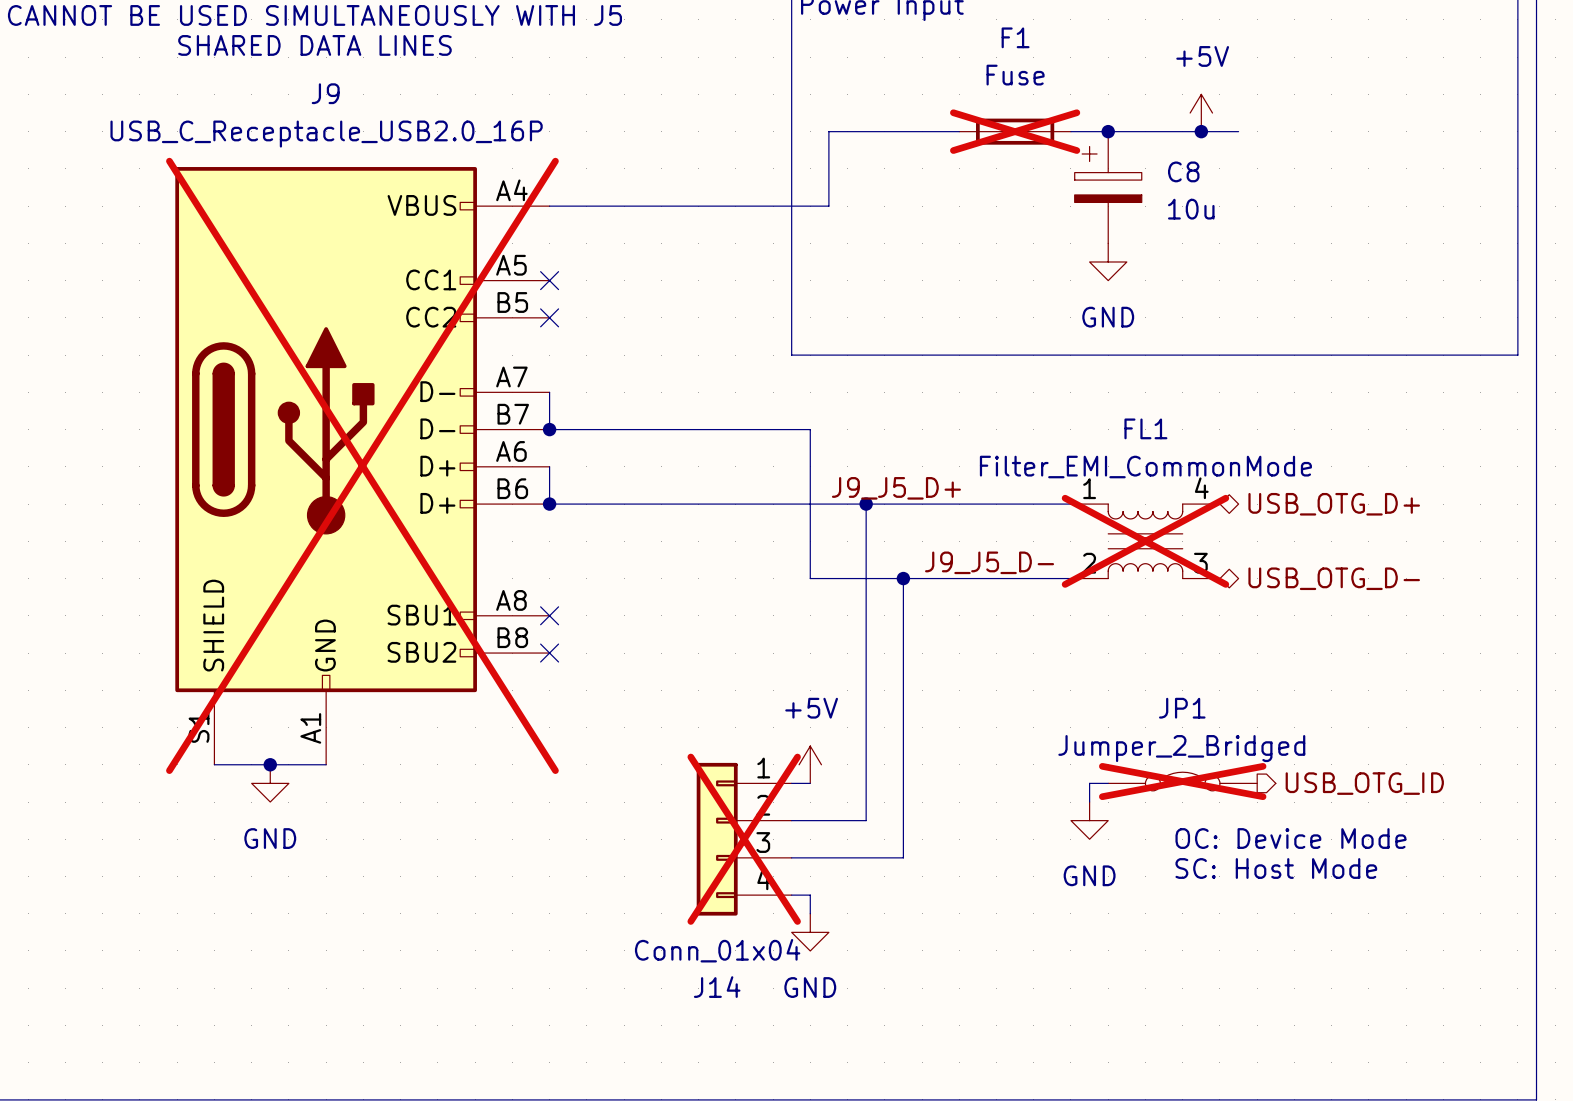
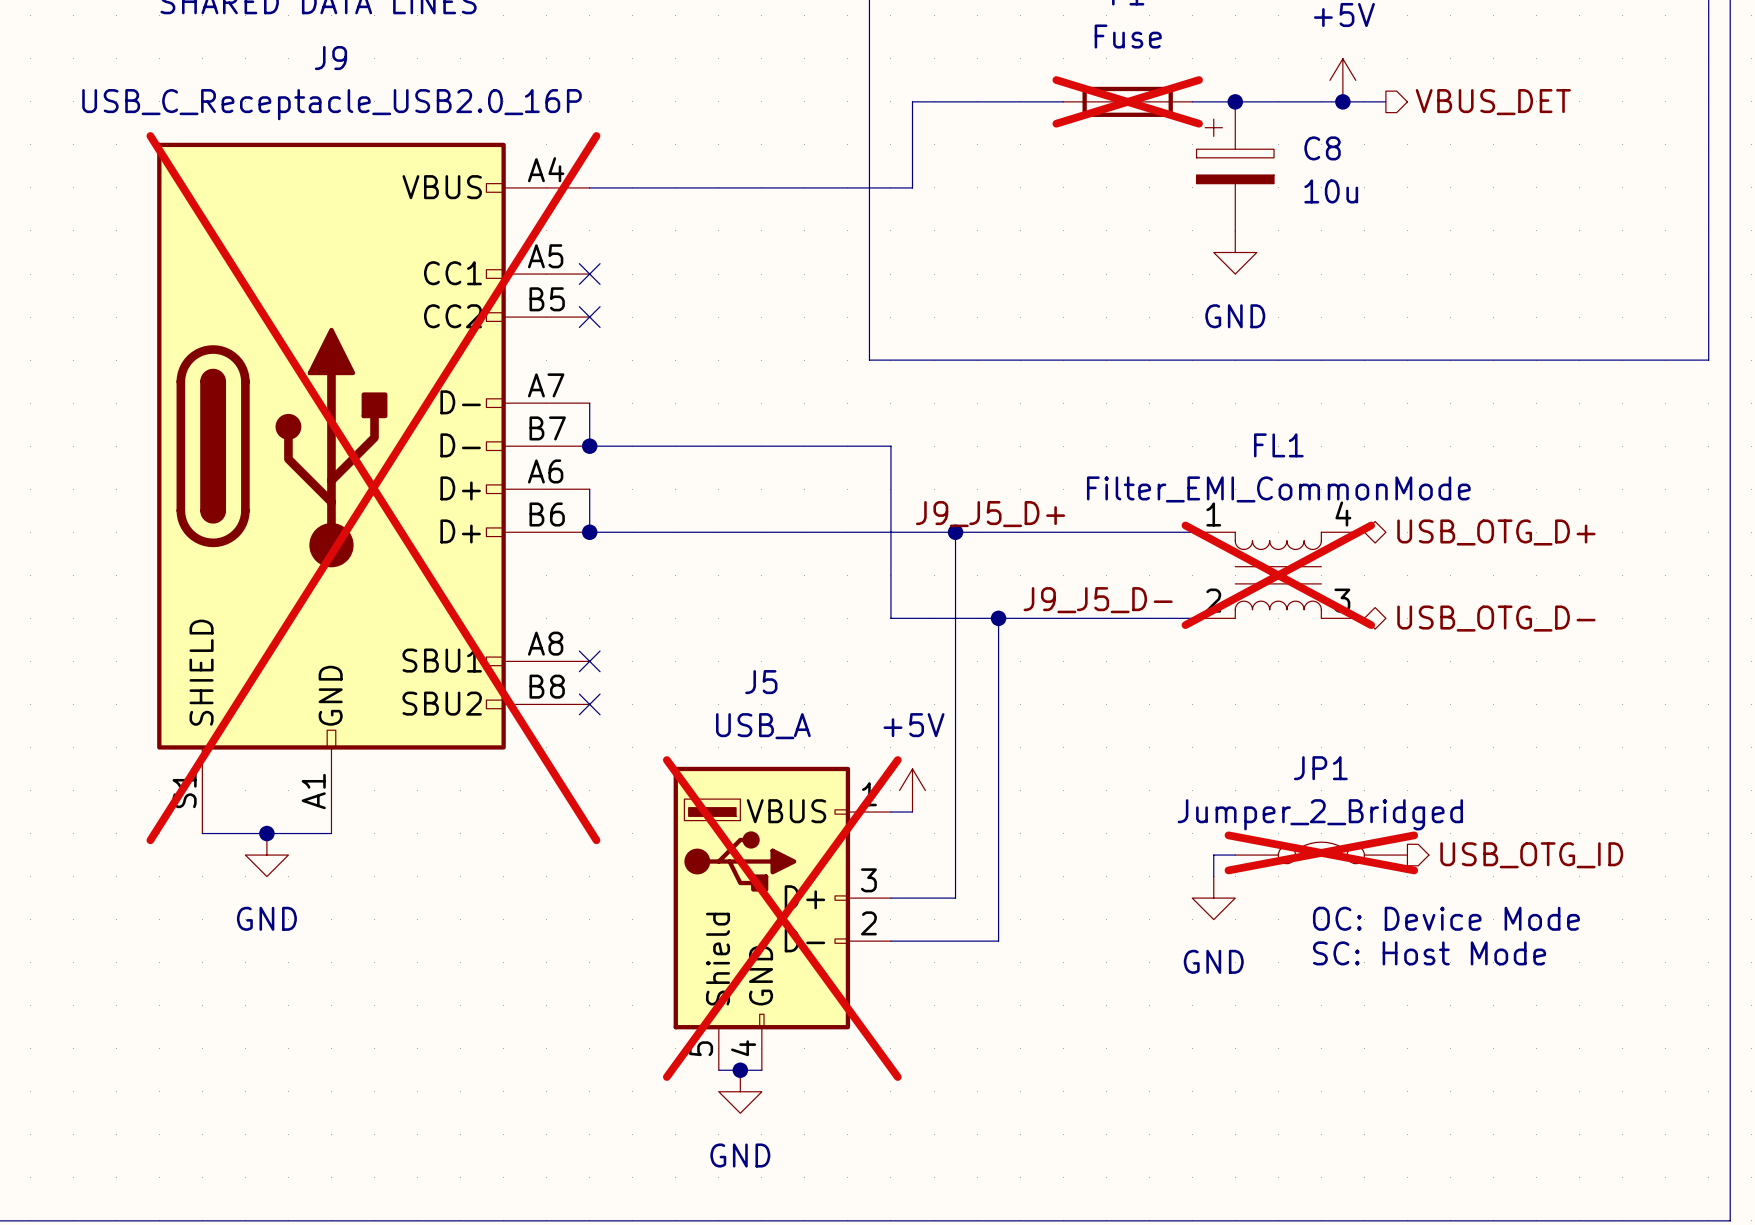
hierarchical label: none -> VBUS_DET (1493, 102)
power symbol position: +5V (810, 764) -> +5V (912, 790)
wire: (791, 783) (810, 783) -> (890, 812) (912, 812)
J5: none -> USB_A (782, 918)
J14: Conn_01x04 (744, 839) -> none
wire: (791, 895) (810, 895) (810, 913) -> none
power symbol position: GND (810, 932) -> GND (740, 1091)
wire: none -> (718, 1070) (761, 1070)
junction: none -> (740, 1070)

